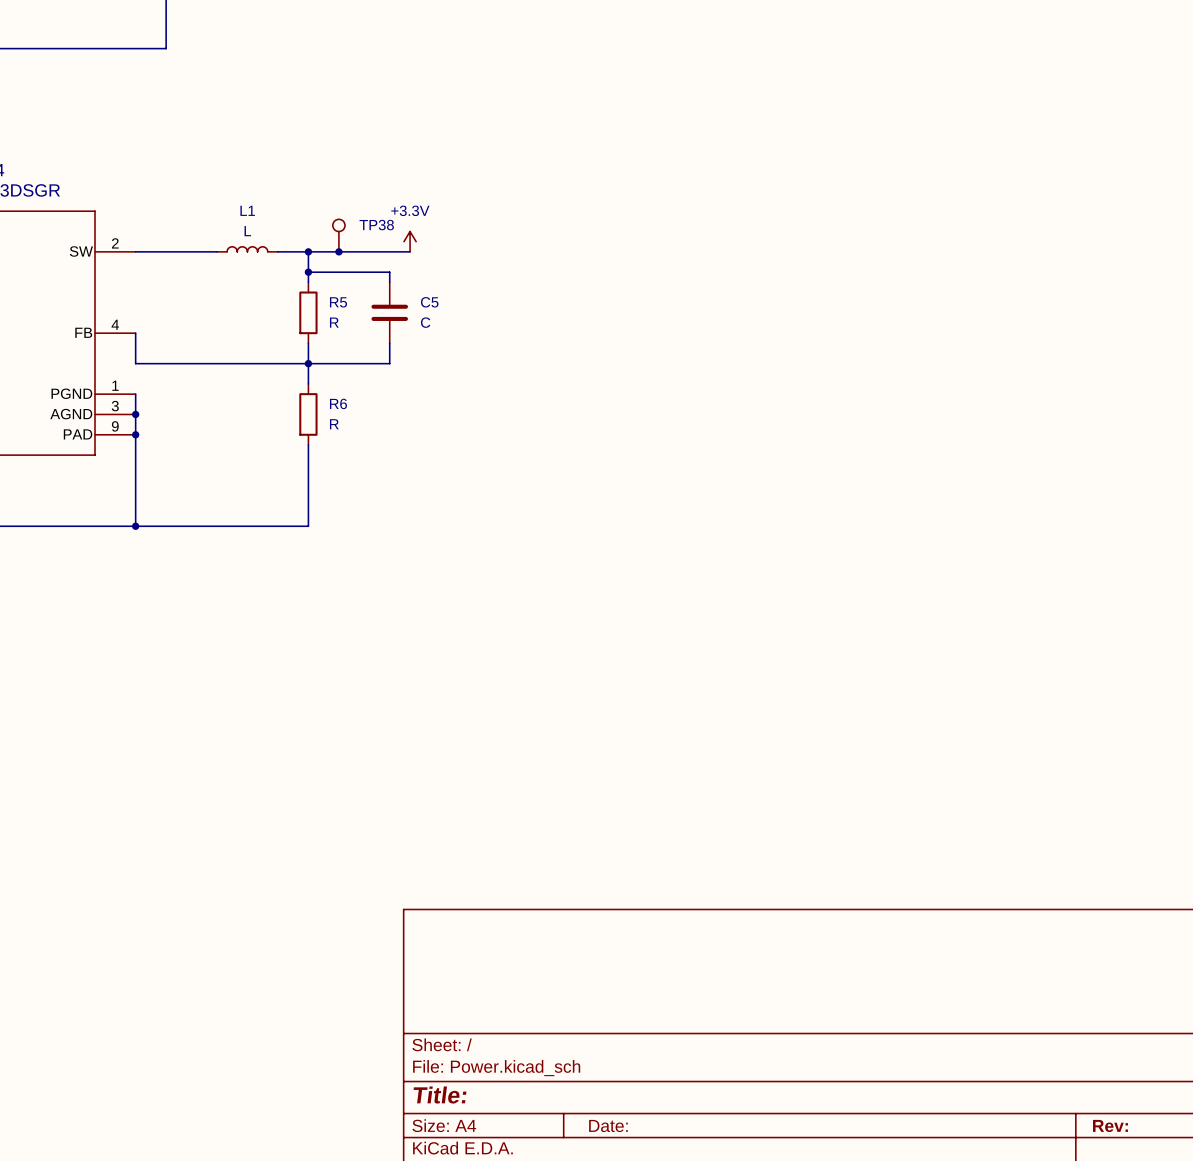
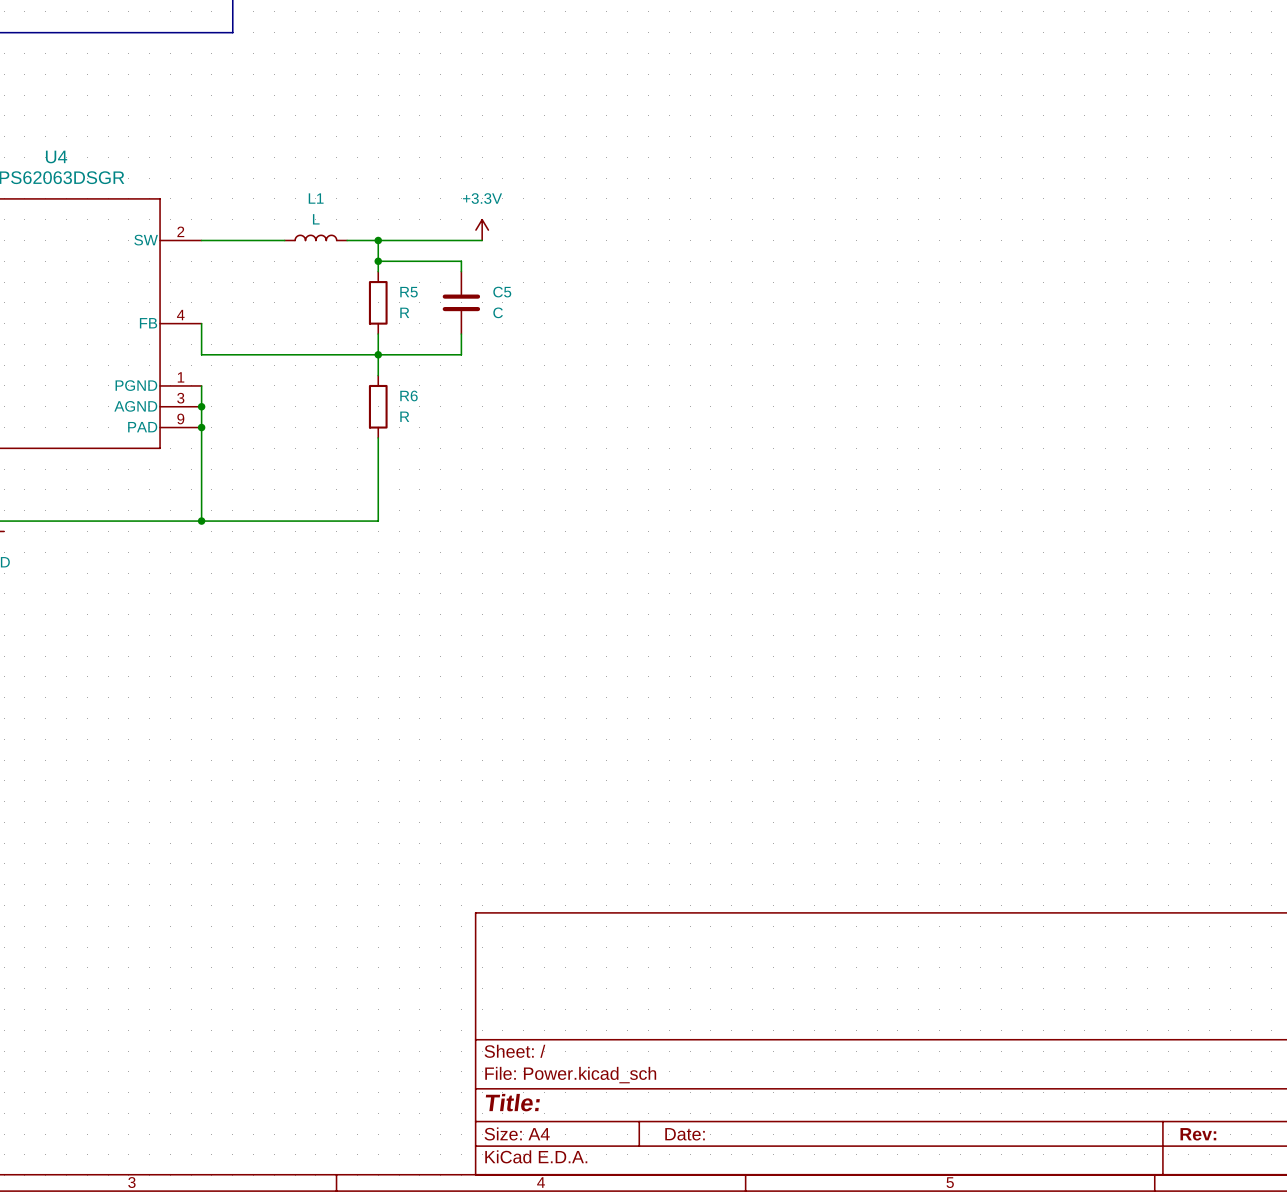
TP38: (338, 235) -> none
junction: (338, 251) -> none

